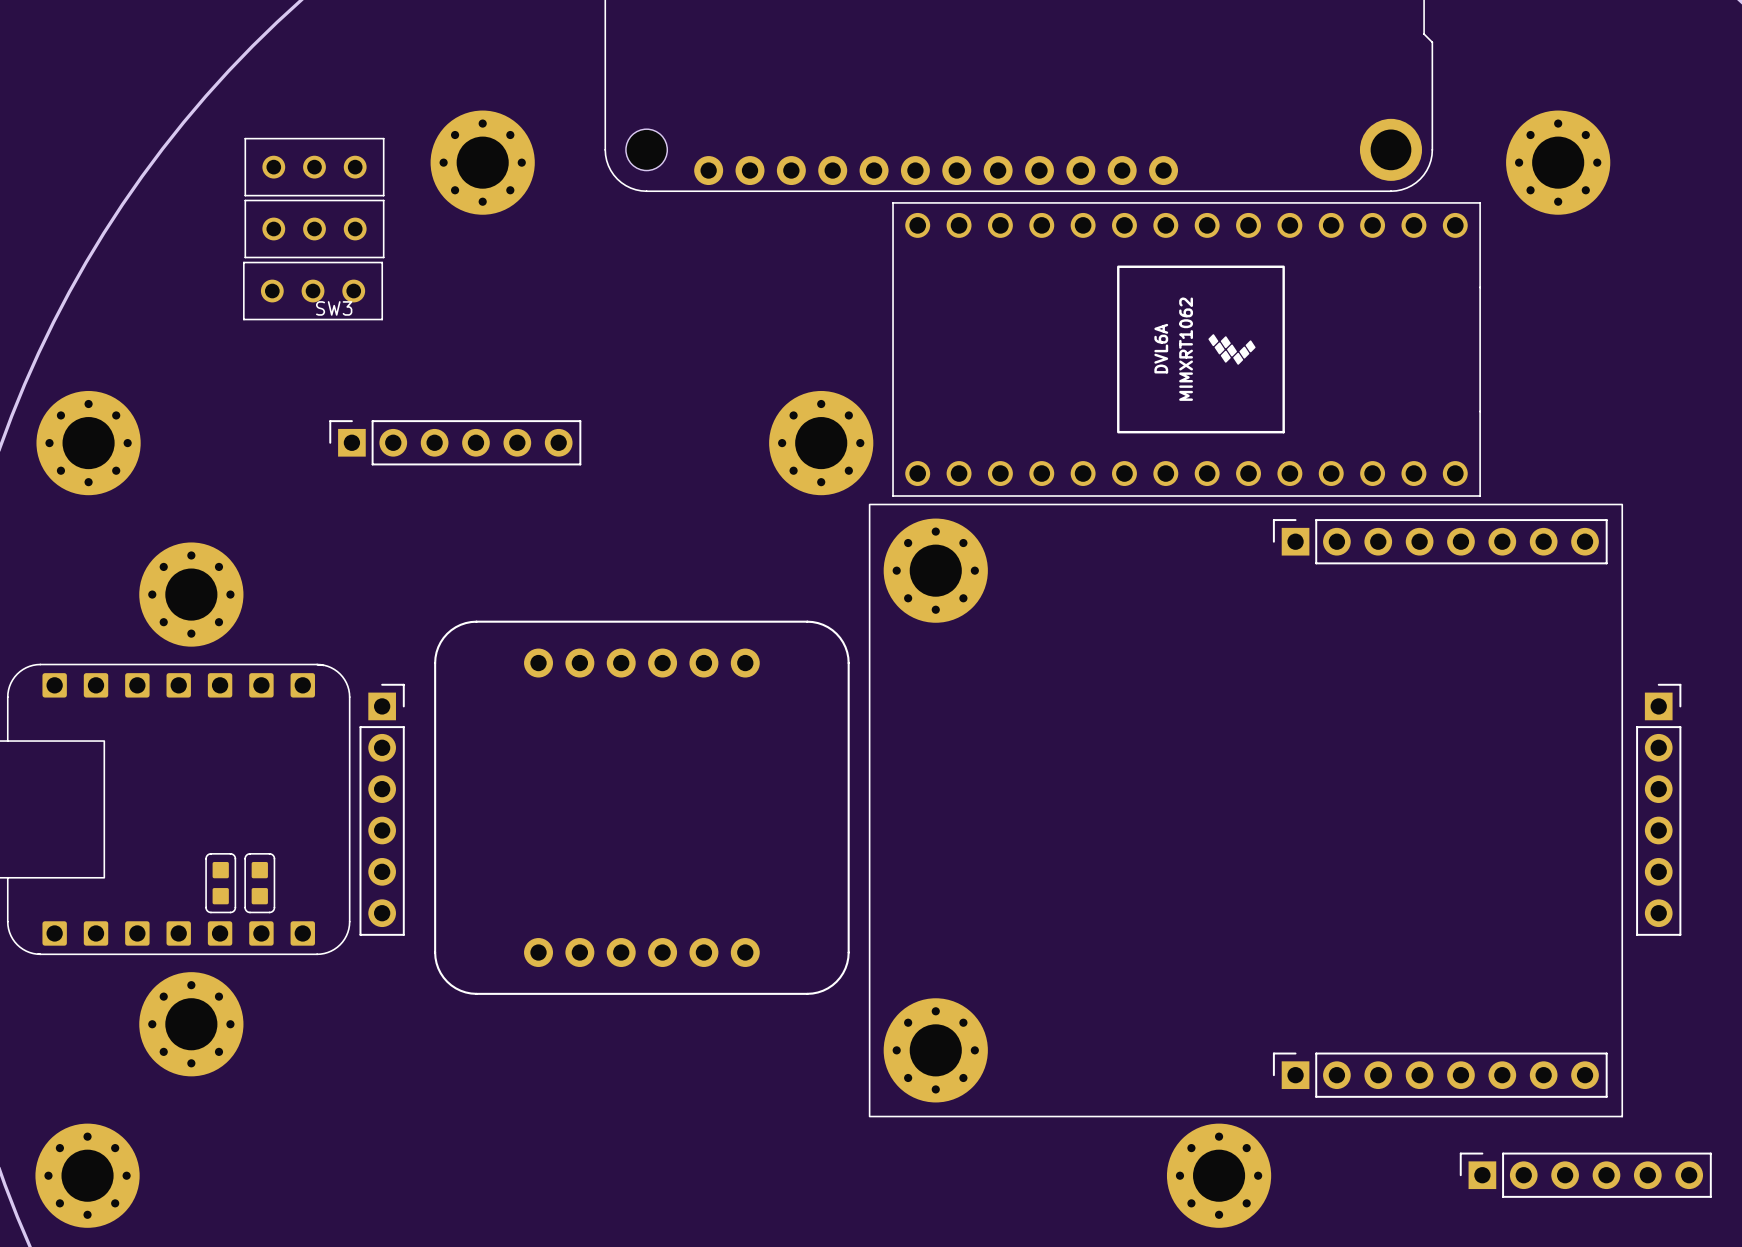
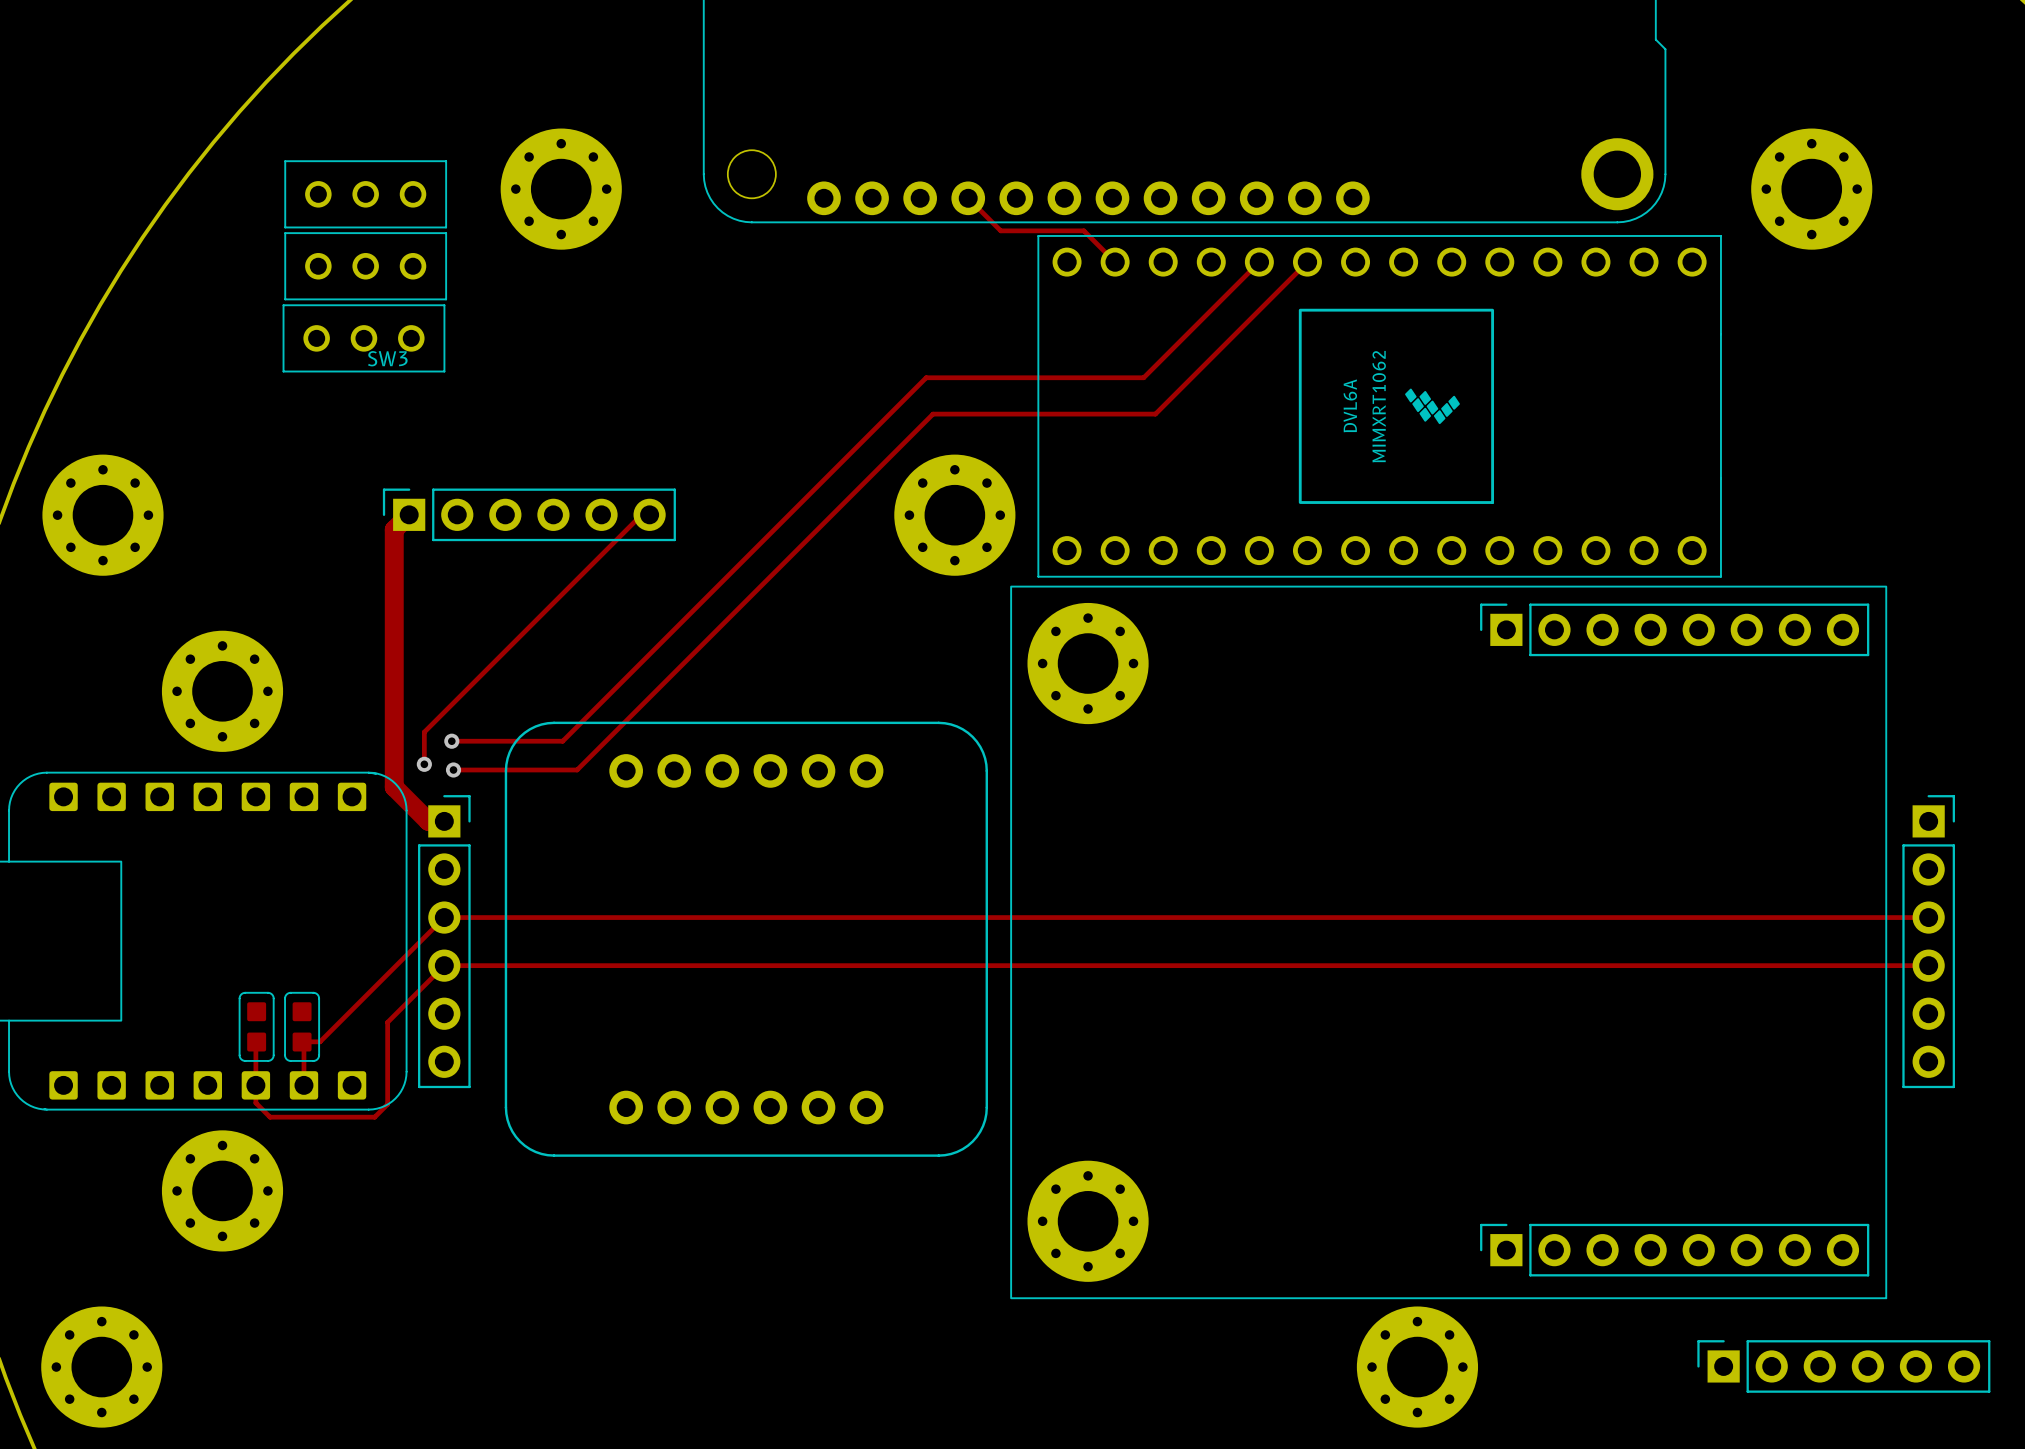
track: none -> (968, 198) (1000, 230) (1083, 230) (1115, 262)
track: none -> (1259, 262) (1143, 377) (926, 377) (562, 741) (451, 741)
track: none -> (1307, 262) (1155, 414) (933, 414) (577, 769) (453, 769)
track: none -> (409, 514) (394, 529) (394, 787) (428, 821) (444, 821)
track: none -> (649, 514) (641, 514) (424, 732) (424, 764)
via: none -> (451, 741)
via: none -> (424, 764)
via: none -> (453, 769)
track: none -> (1928, 917) (444, 917) (320, 1041) (303, 1041) (303, 1085)
track: none -> (1928, 965) (444, 965) (387, 1022) (387, 1104) (374, 1117) (270, 1117) (255, 1102) (255, 1042)

